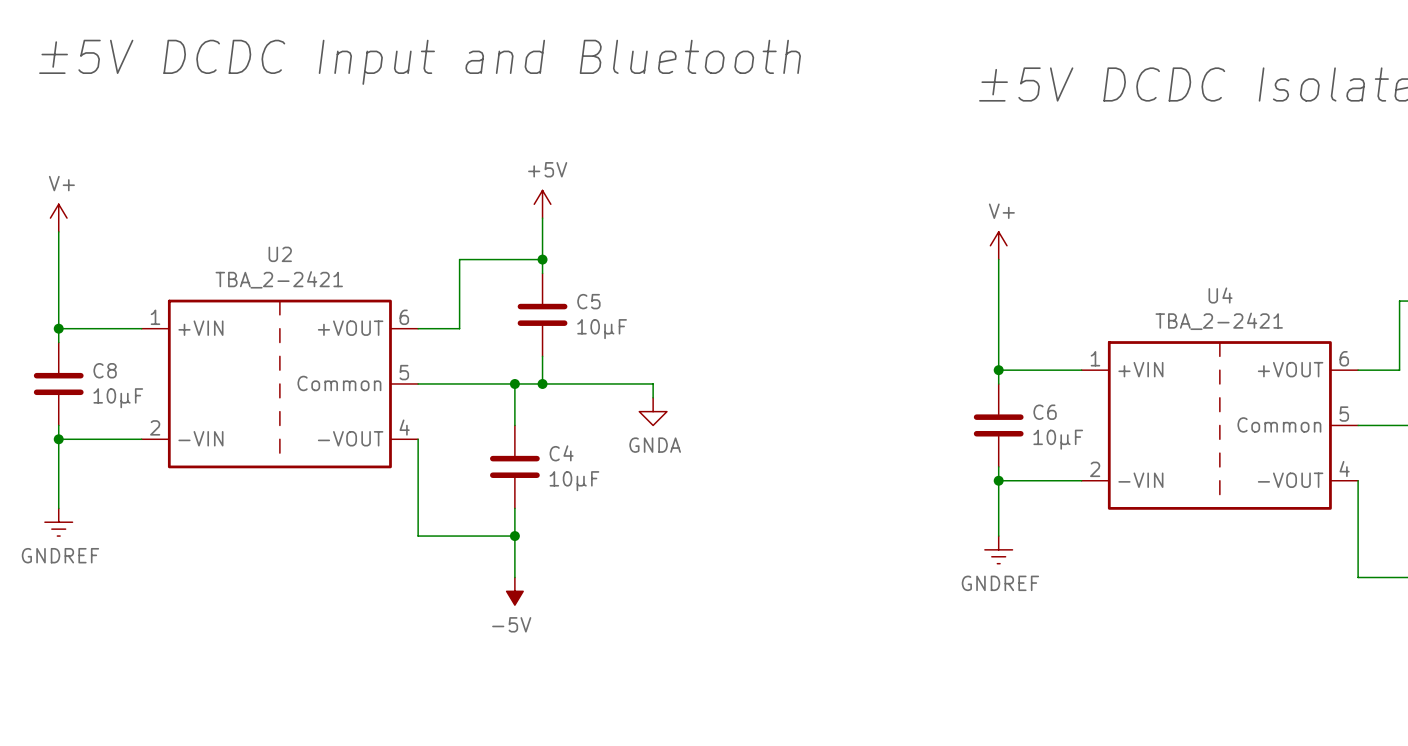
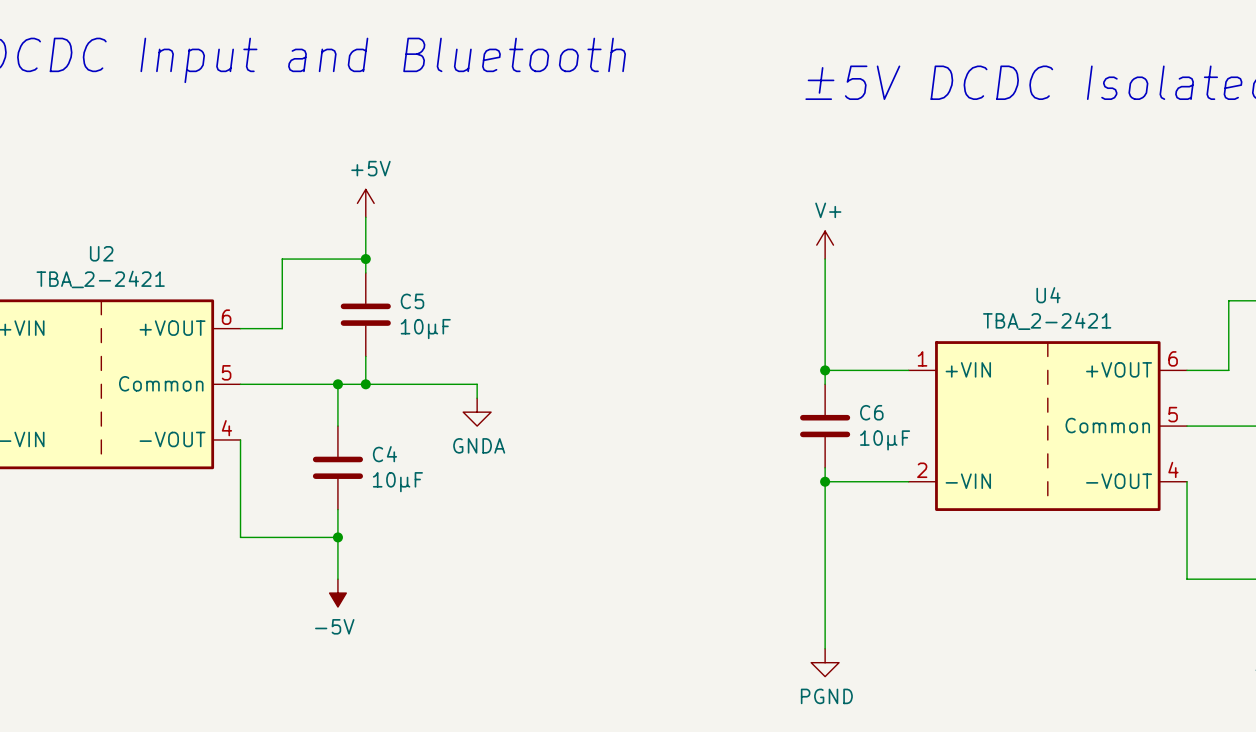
wire: none -> (825, 537) (825, 648)
power symbol: GNDREF (998, 549) -> none
power symbol: none -> PGND (825, 662)

